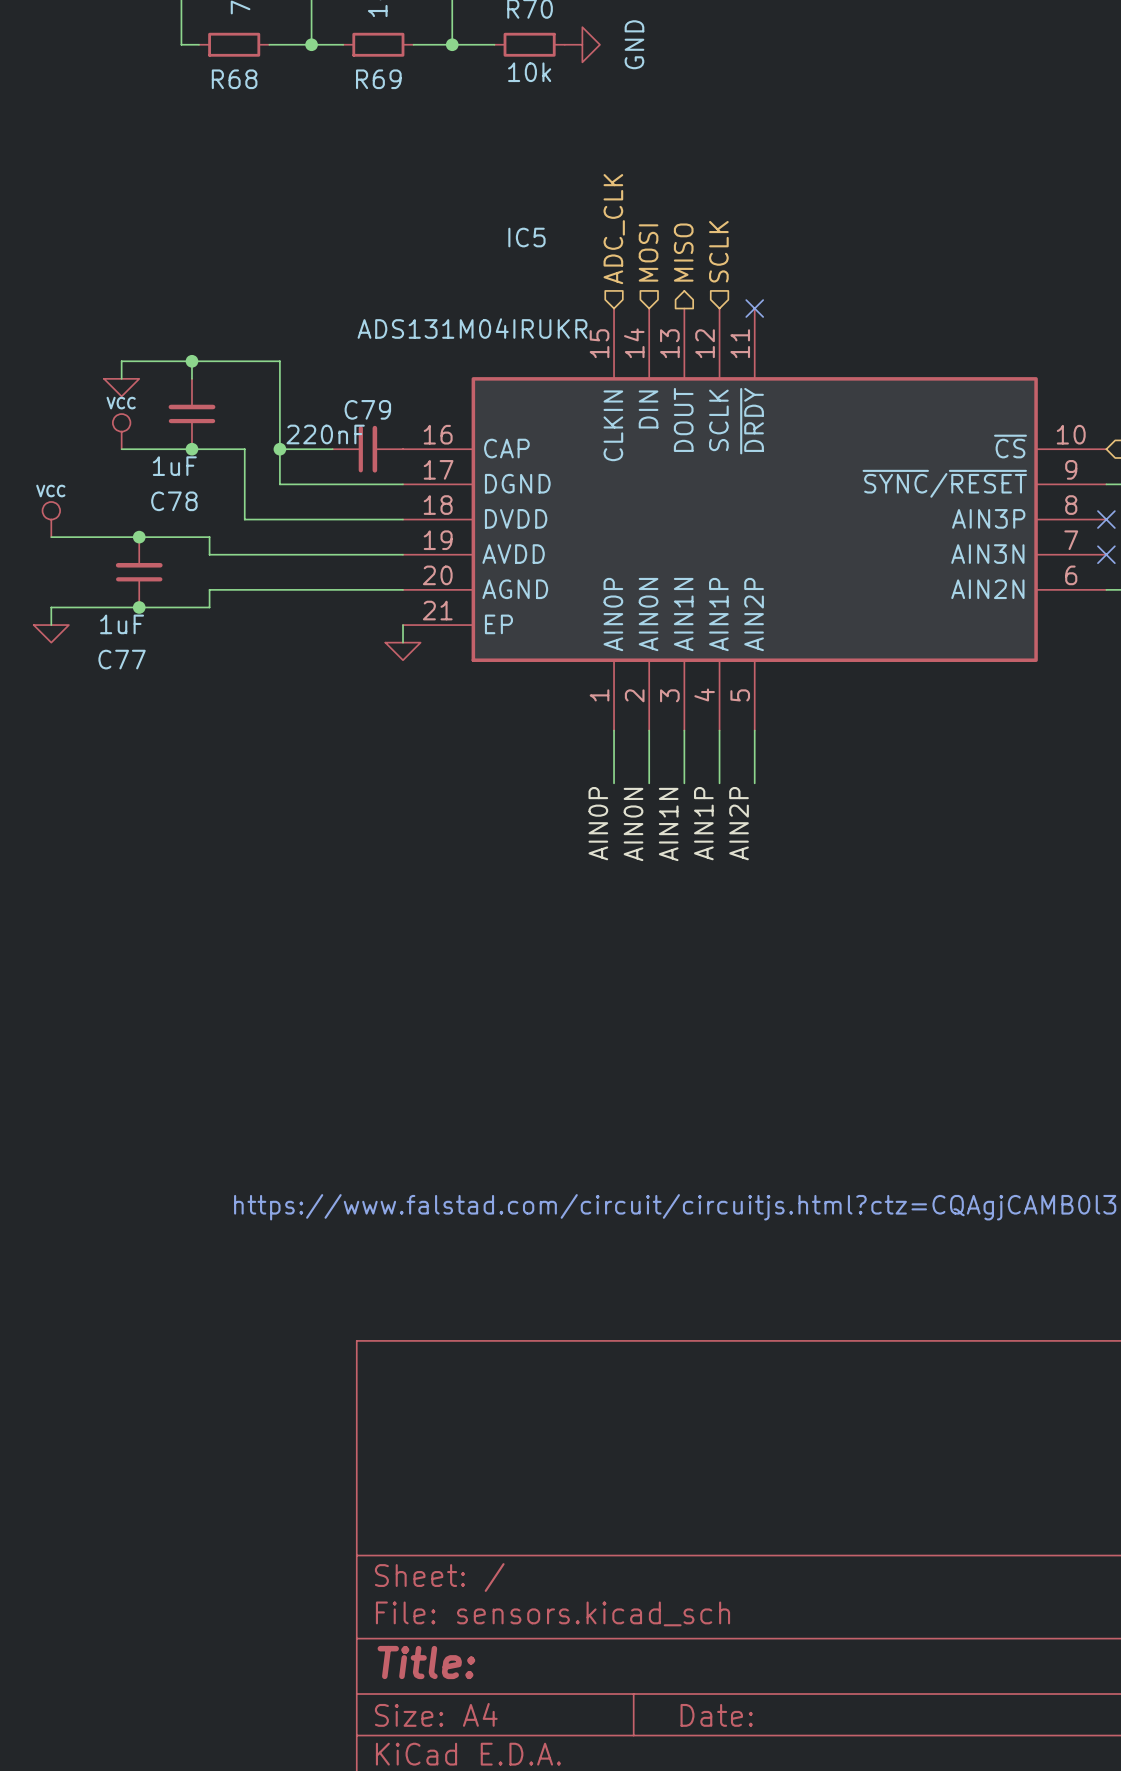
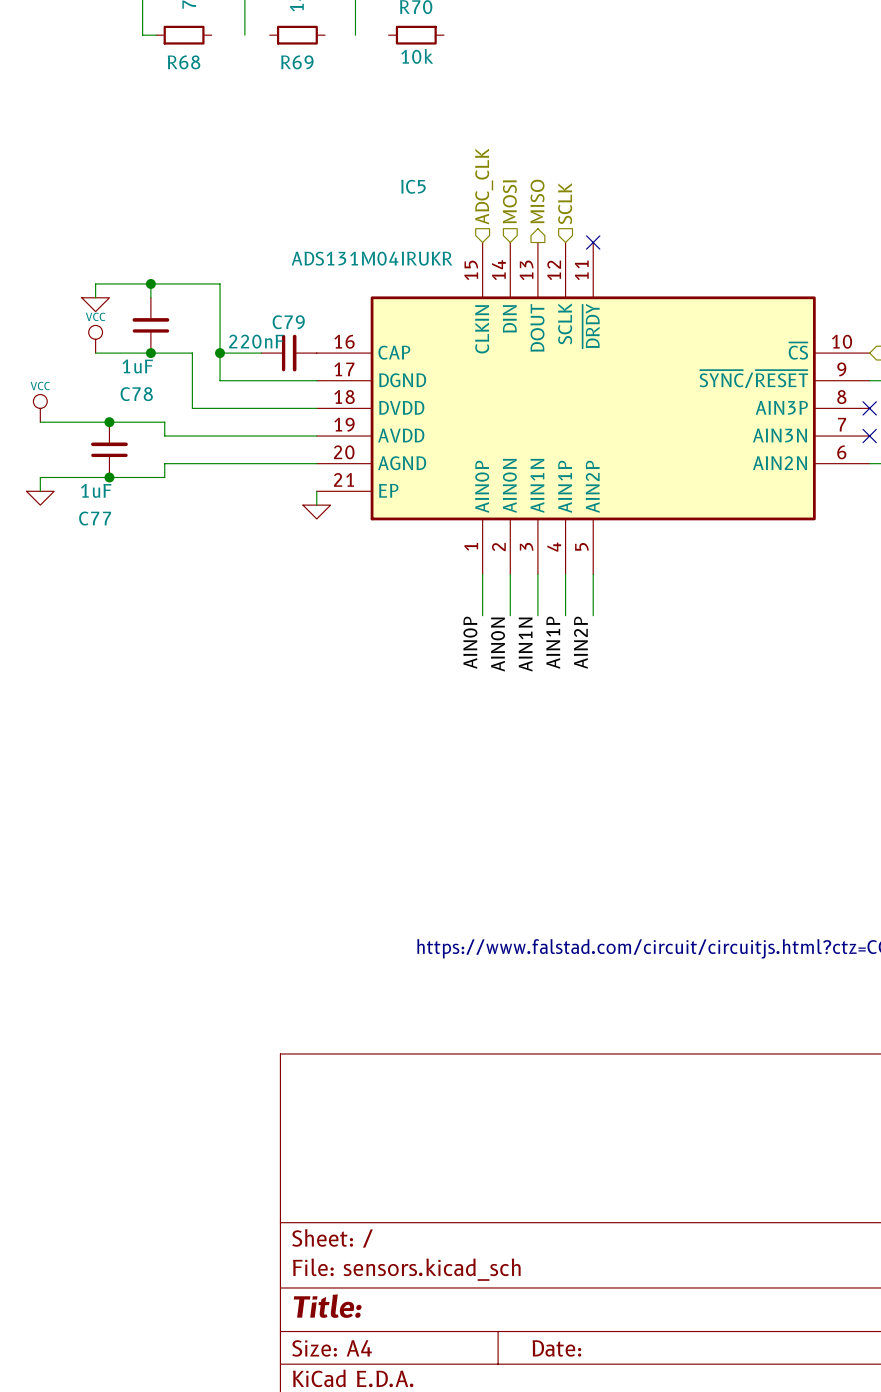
wire: (269, 44) (343, 44) -> none
junction: (311, 44) -> none
wire: (413, 44) (494, 44) -> none
junction: (452, 44) -> none
power symbol: GND (582, 44) -> none

